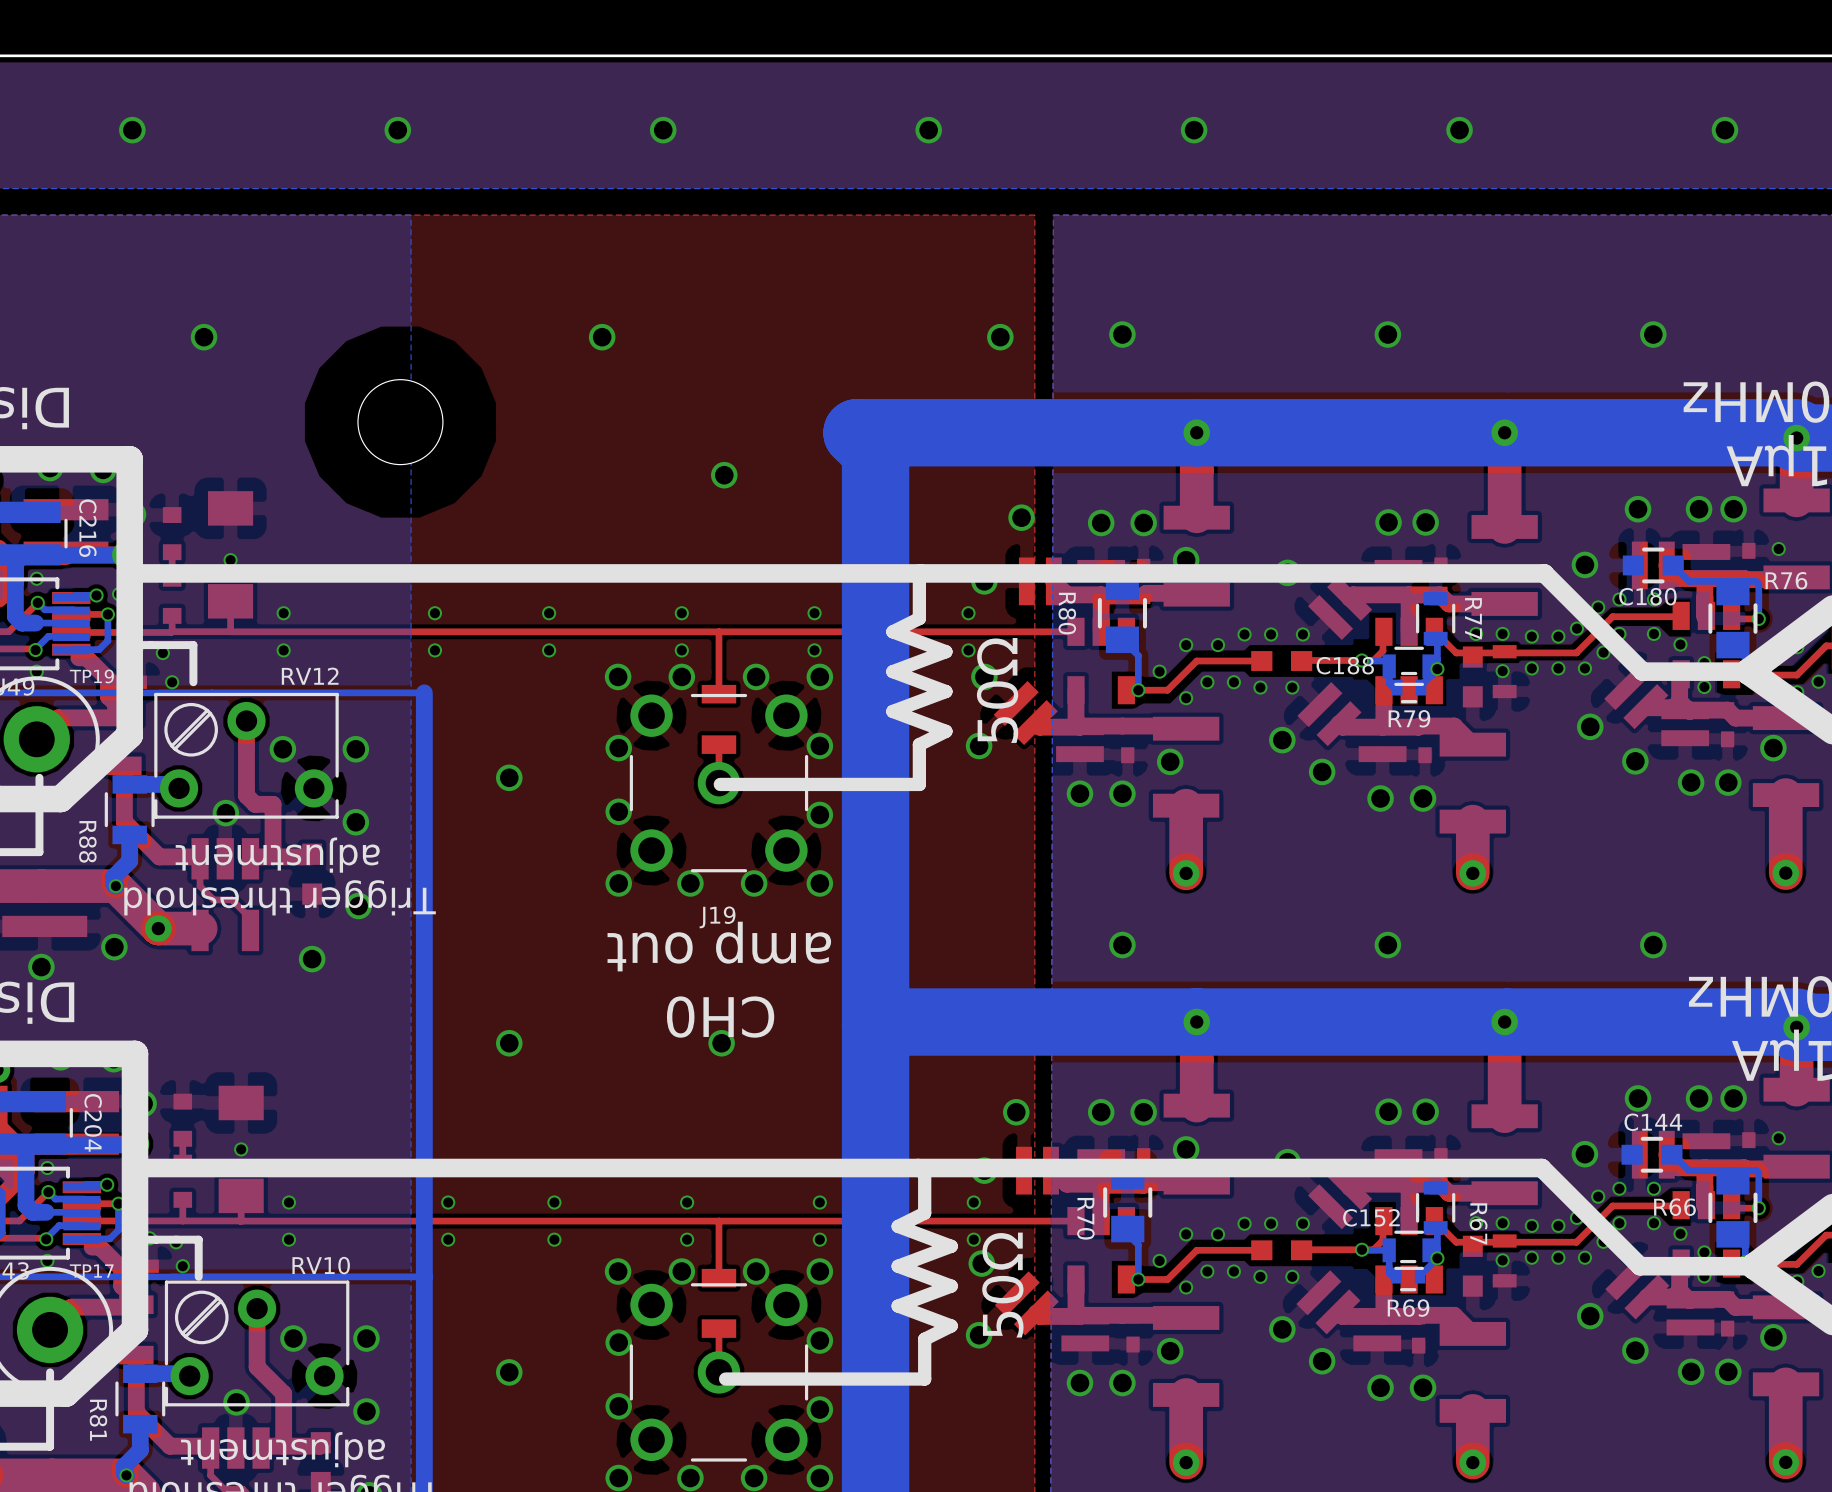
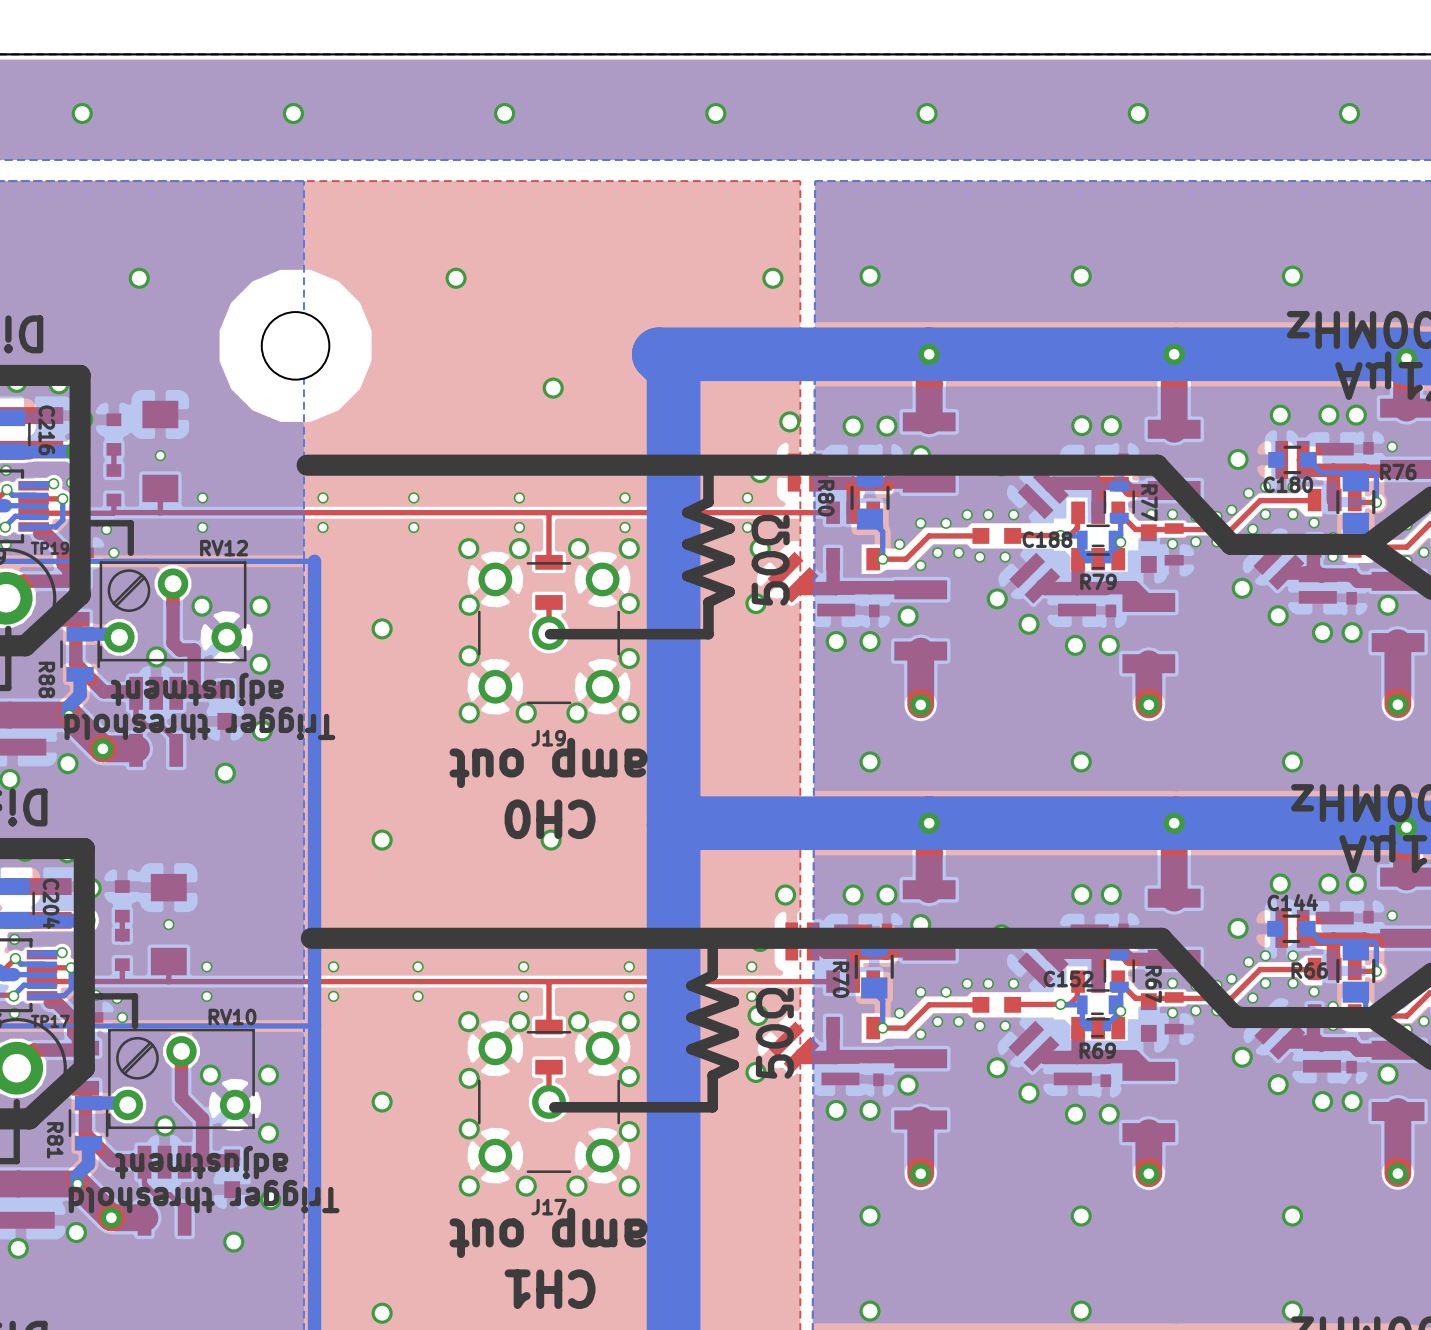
line: (135, 573) (1544, 573) (1642, 671) -> (307, 465) (1157, 465) (1231, 544) (1284, 544)
line width: thin (1751, 671) (1642, 671) -> thick (1370, 544) (1284, 544)
line: (132, 1168) (1541, 1168) (1640, 1266) -> (311, 938) (1161, 938) (1235, 1017) (1281, 1017)
line width: thin (1748, 1266) (1640, 1266) -> thick (1368, 1017) (1281, 1017)

